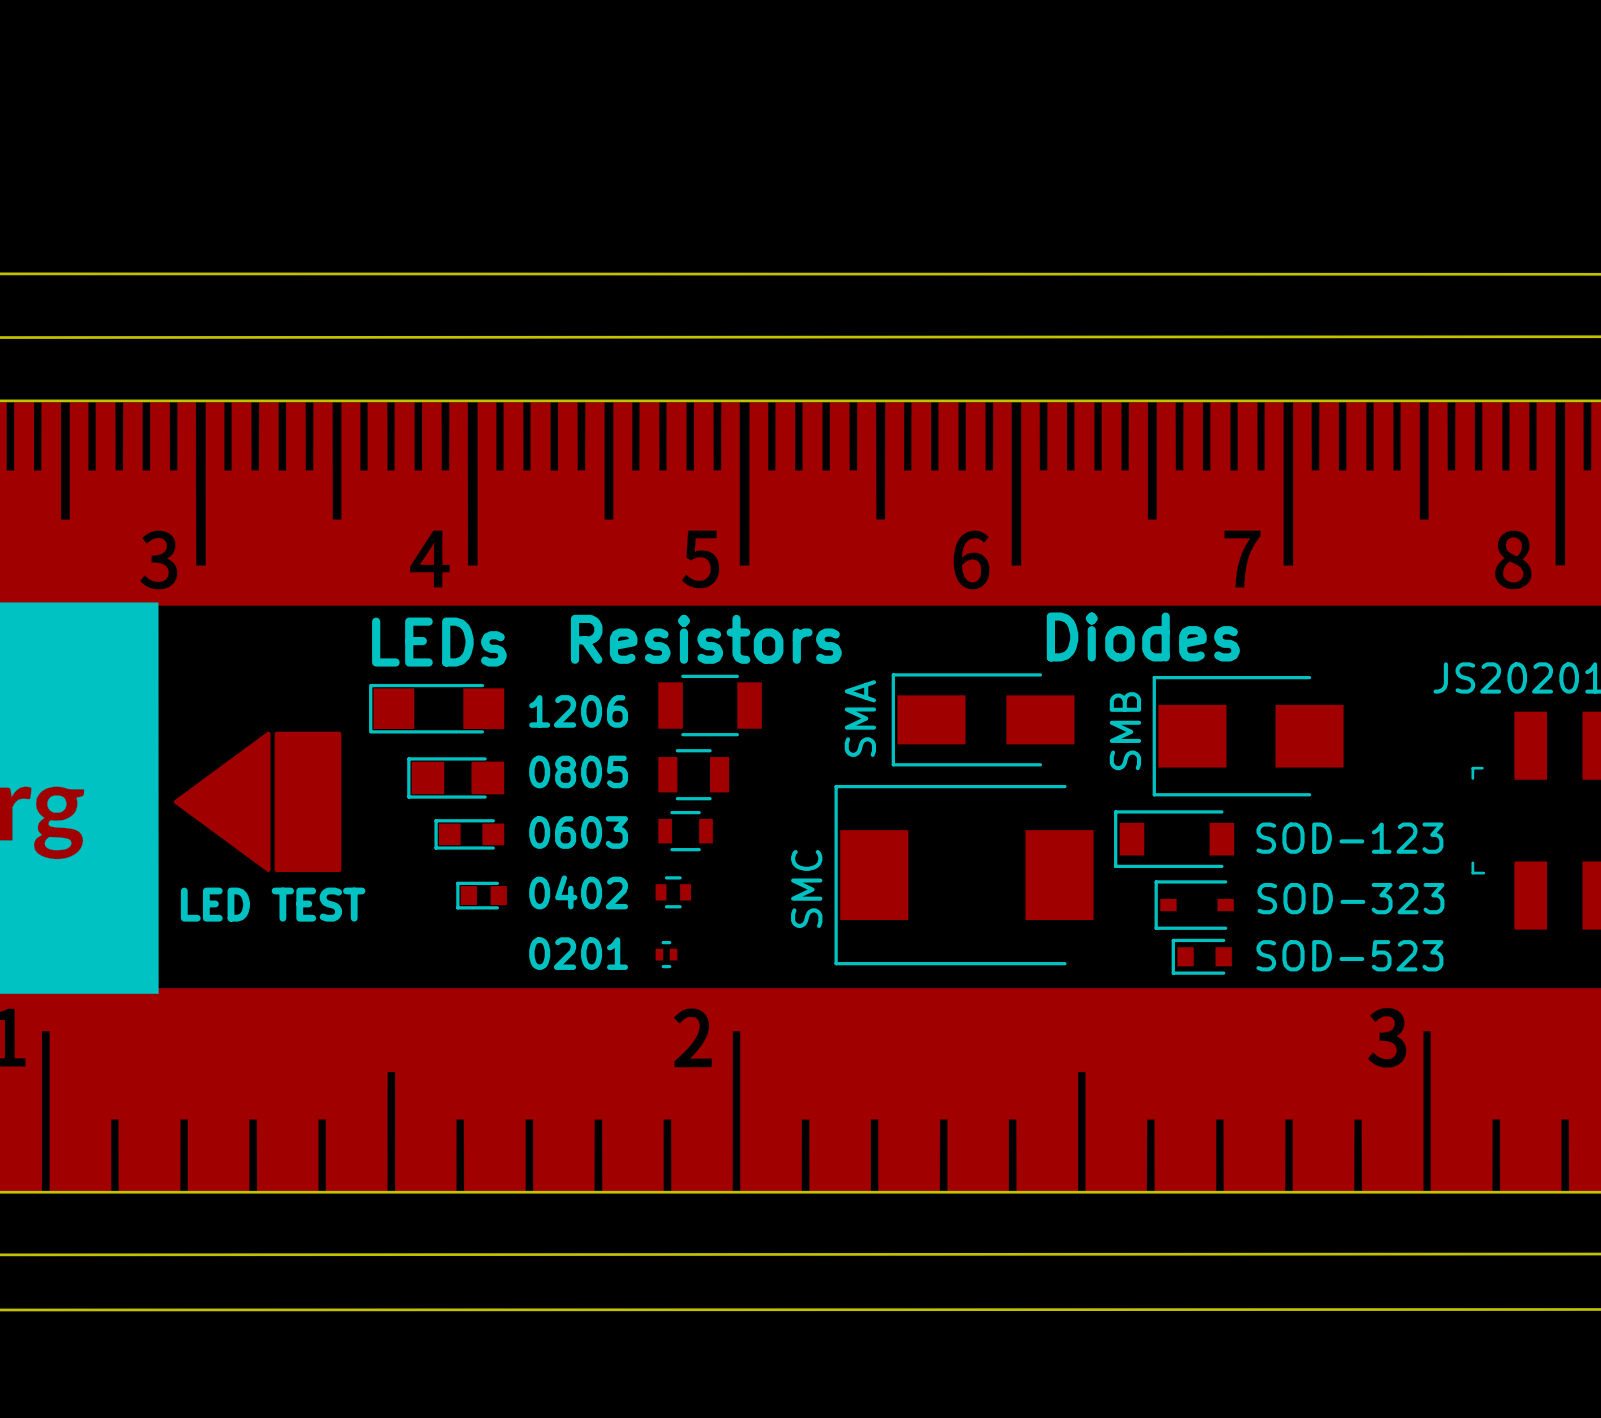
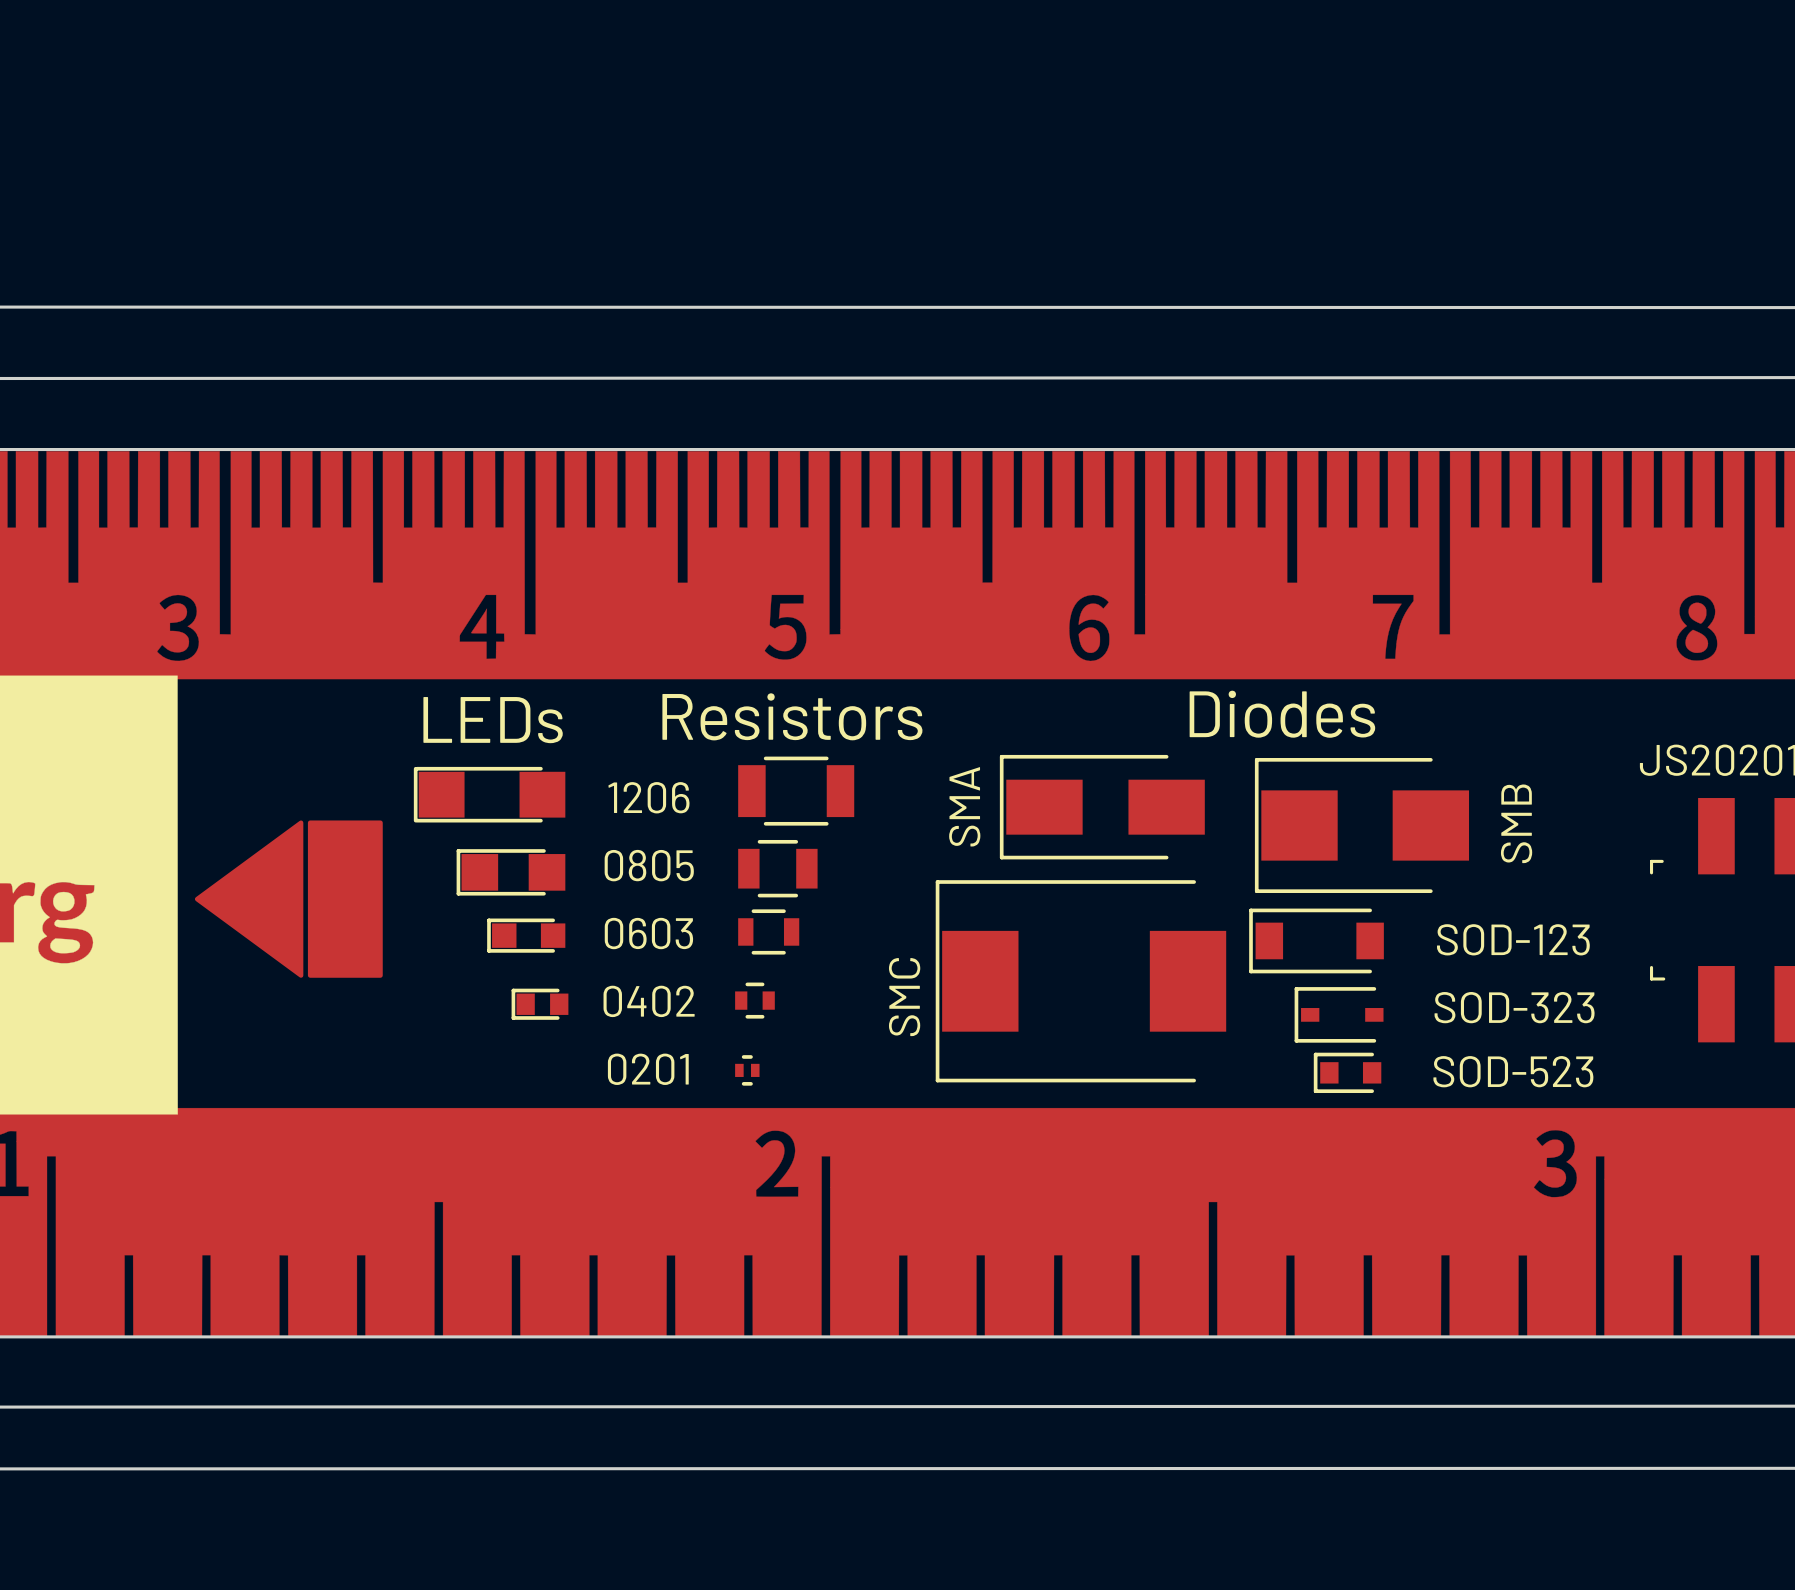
part value position: SMB (1125, 731) -> SMB (1516, 823)
part position: (1248, 736) -> (1361, 825)
part text: LED TEST (273, 904) -> none

